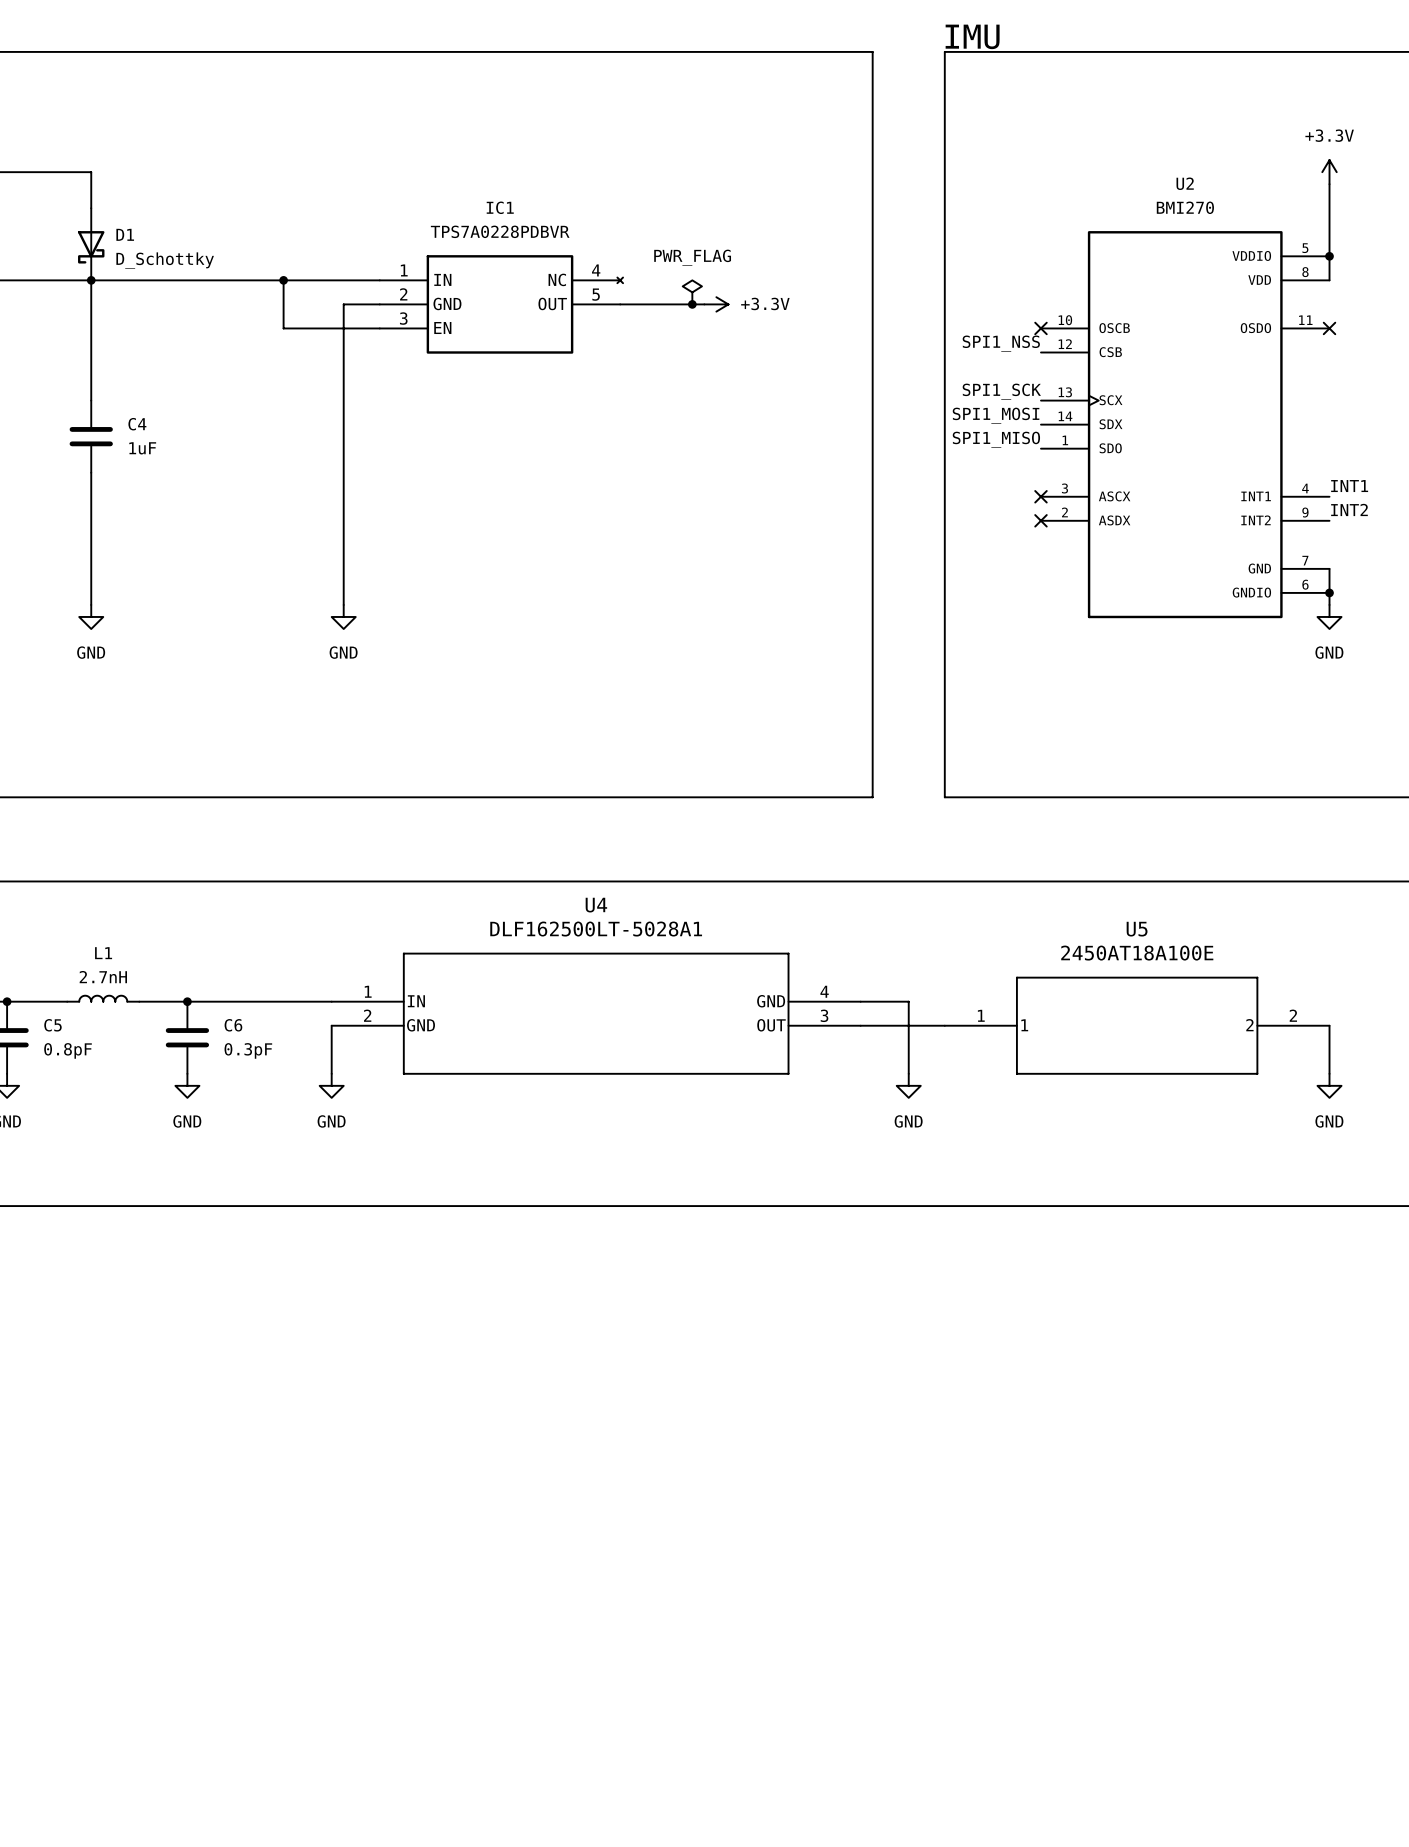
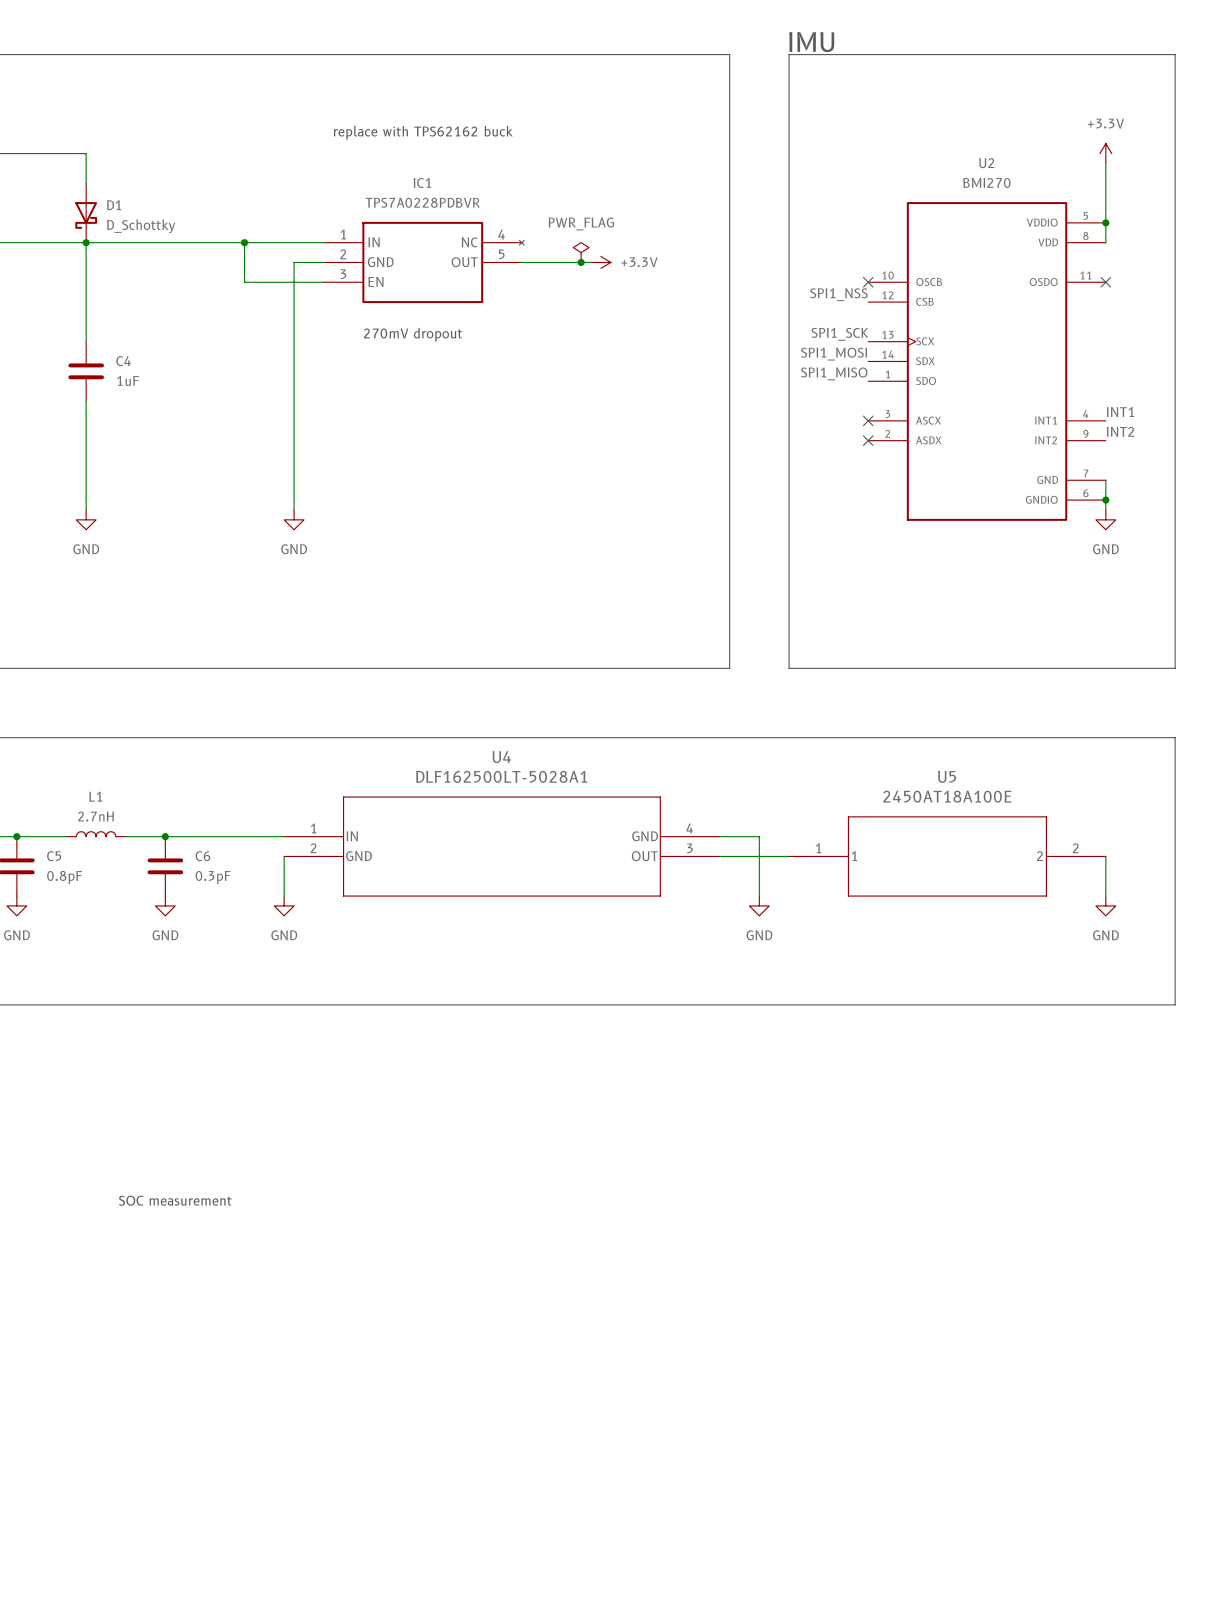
text: none -> replace with TPS62162 buck (423, 132)
text: none -> 270mV dropout (413, 334)
text: none -> SOC measurement (175, 1200)

